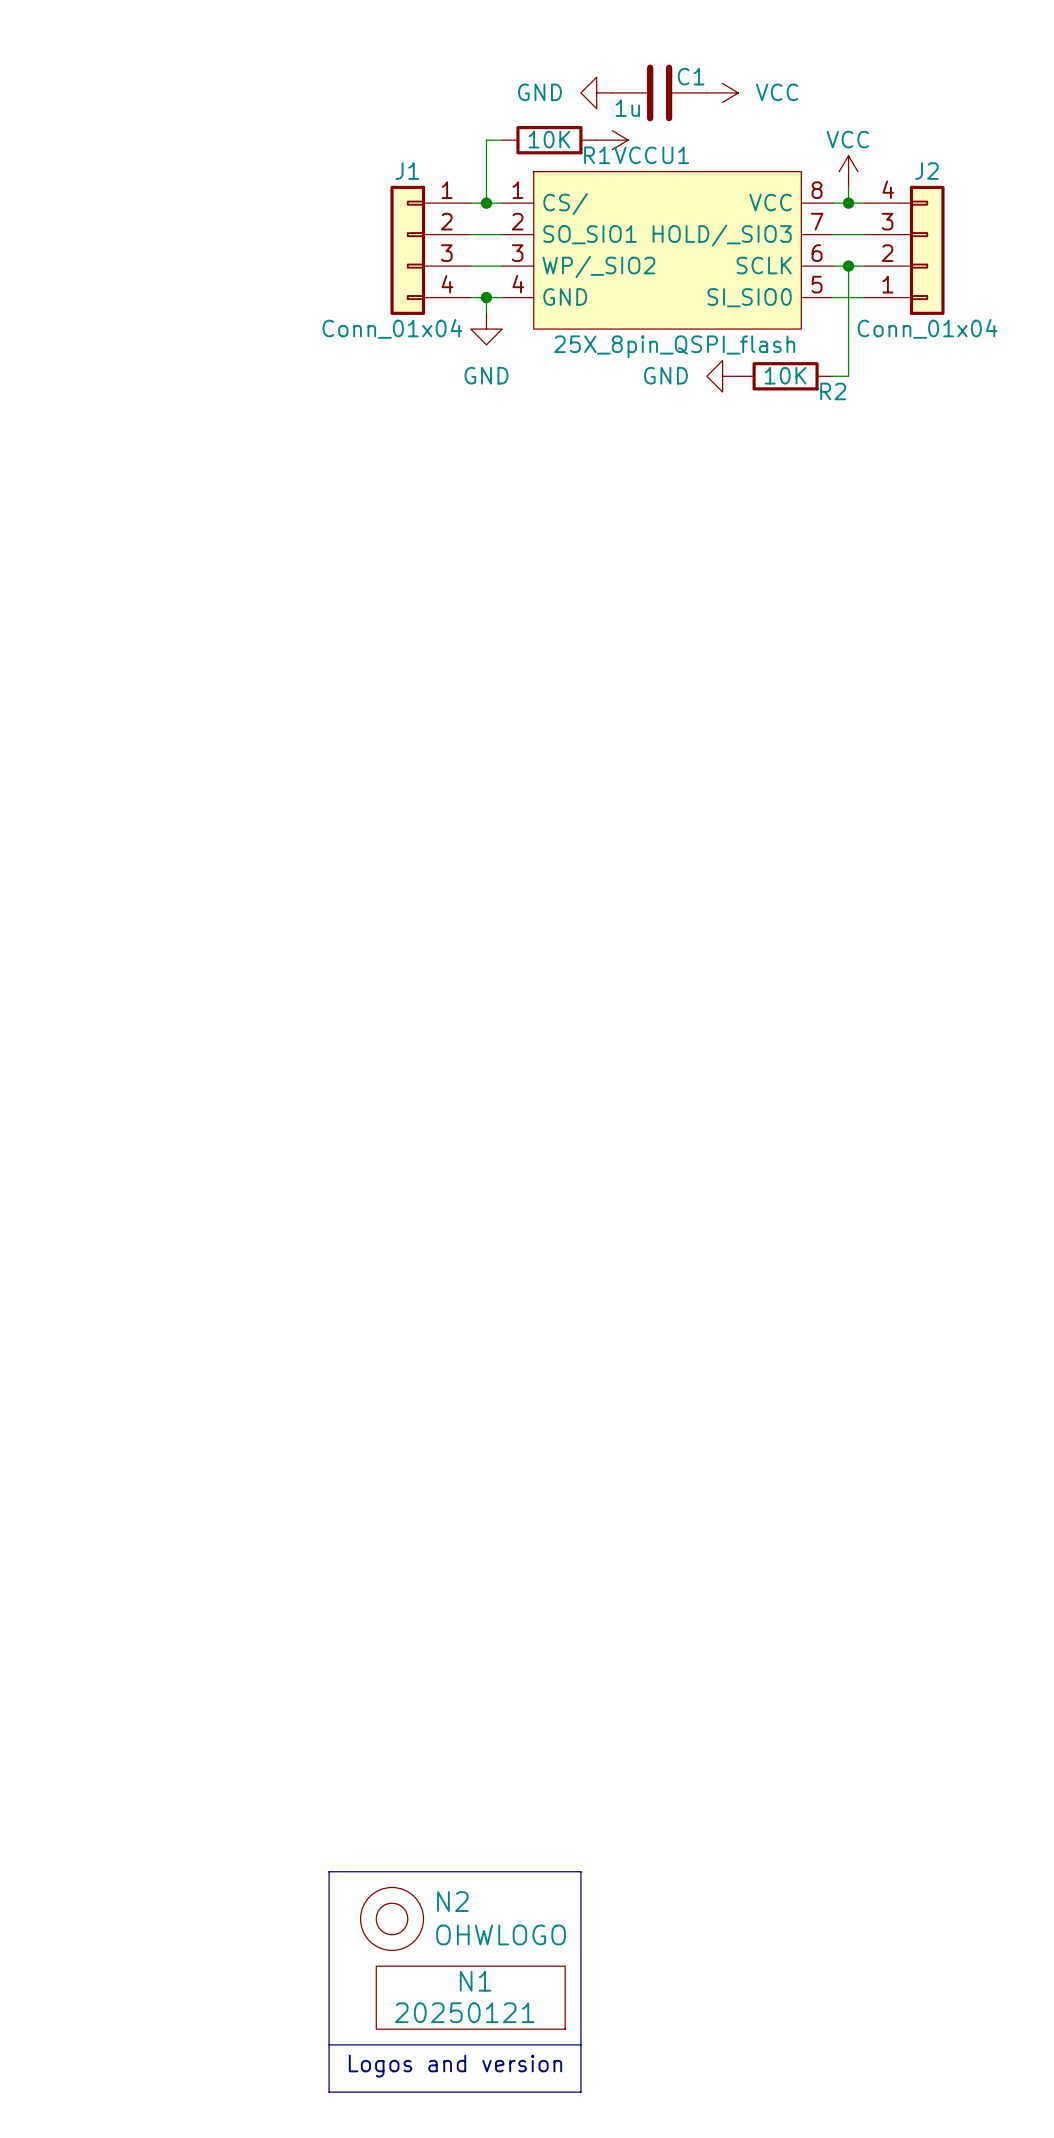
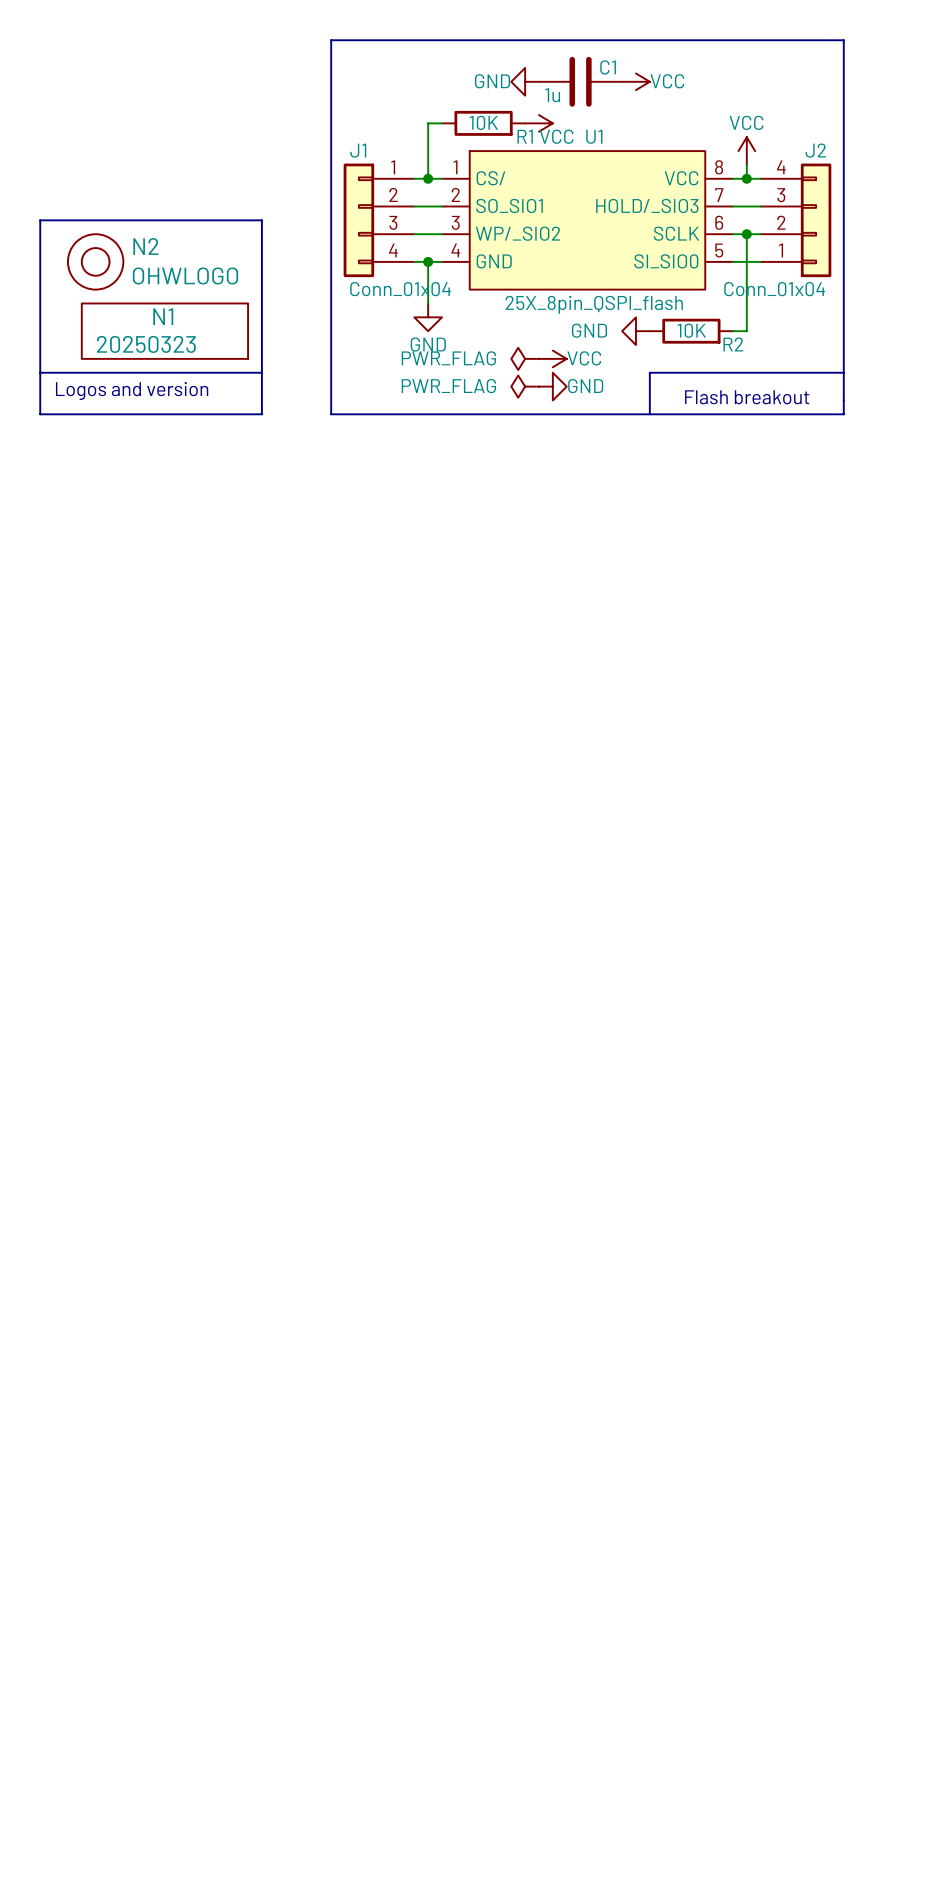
line: none -> (331, 40) (331, 414) (843, 414) (843, 40) (331, 40)
power symbol text position: GND (539, 92) -> GND (492, 81)
power symbol text position: VCC (777, 92) -> VCC (667, 81)
line: none -> (40, 220) (40, 414) (261, 414) (261, 220) (40, 220)
J1 value position: Conn_01x04 (392, 328) -> Conn_01x04 (400, 289)
J2 value position: Conn_01x04 (927, 328) -> Conn_01x04 (774, 289)
power symbol position: GND (486, 329) -> GND (428, 317)
power symbol text position: GND (486, 375) -> GND (428, 344)
power symbol: none -> PWR_FLAG (525, 358)
power symbol: none -> VCC (552, 358)
line: none -> (40, 372) (261, 372)
line: none -> (843, 372) (649, 372) (649, 414)
power symbol: none -> PWR_FLAG (525, 386)
power symbol: none -> GND (552, 386)
text: none -> Logos and version (132, 390)
text: none -> Flash breakout (747, 397)
line: (329, 1871) (329, 2092) (580, 2092) (580, 1871) (329, 1871) -> none
N2 position: (392, 1918) -> (95, 261)
N1 position: (470, 1997) -> (164, 331)
N1 value: 20250121 (464, 2012) -> 20250323 (146, 344)
line: (329, 2044) (580, 2044) -> none
text: Logos and version (455, 2066) -> none

